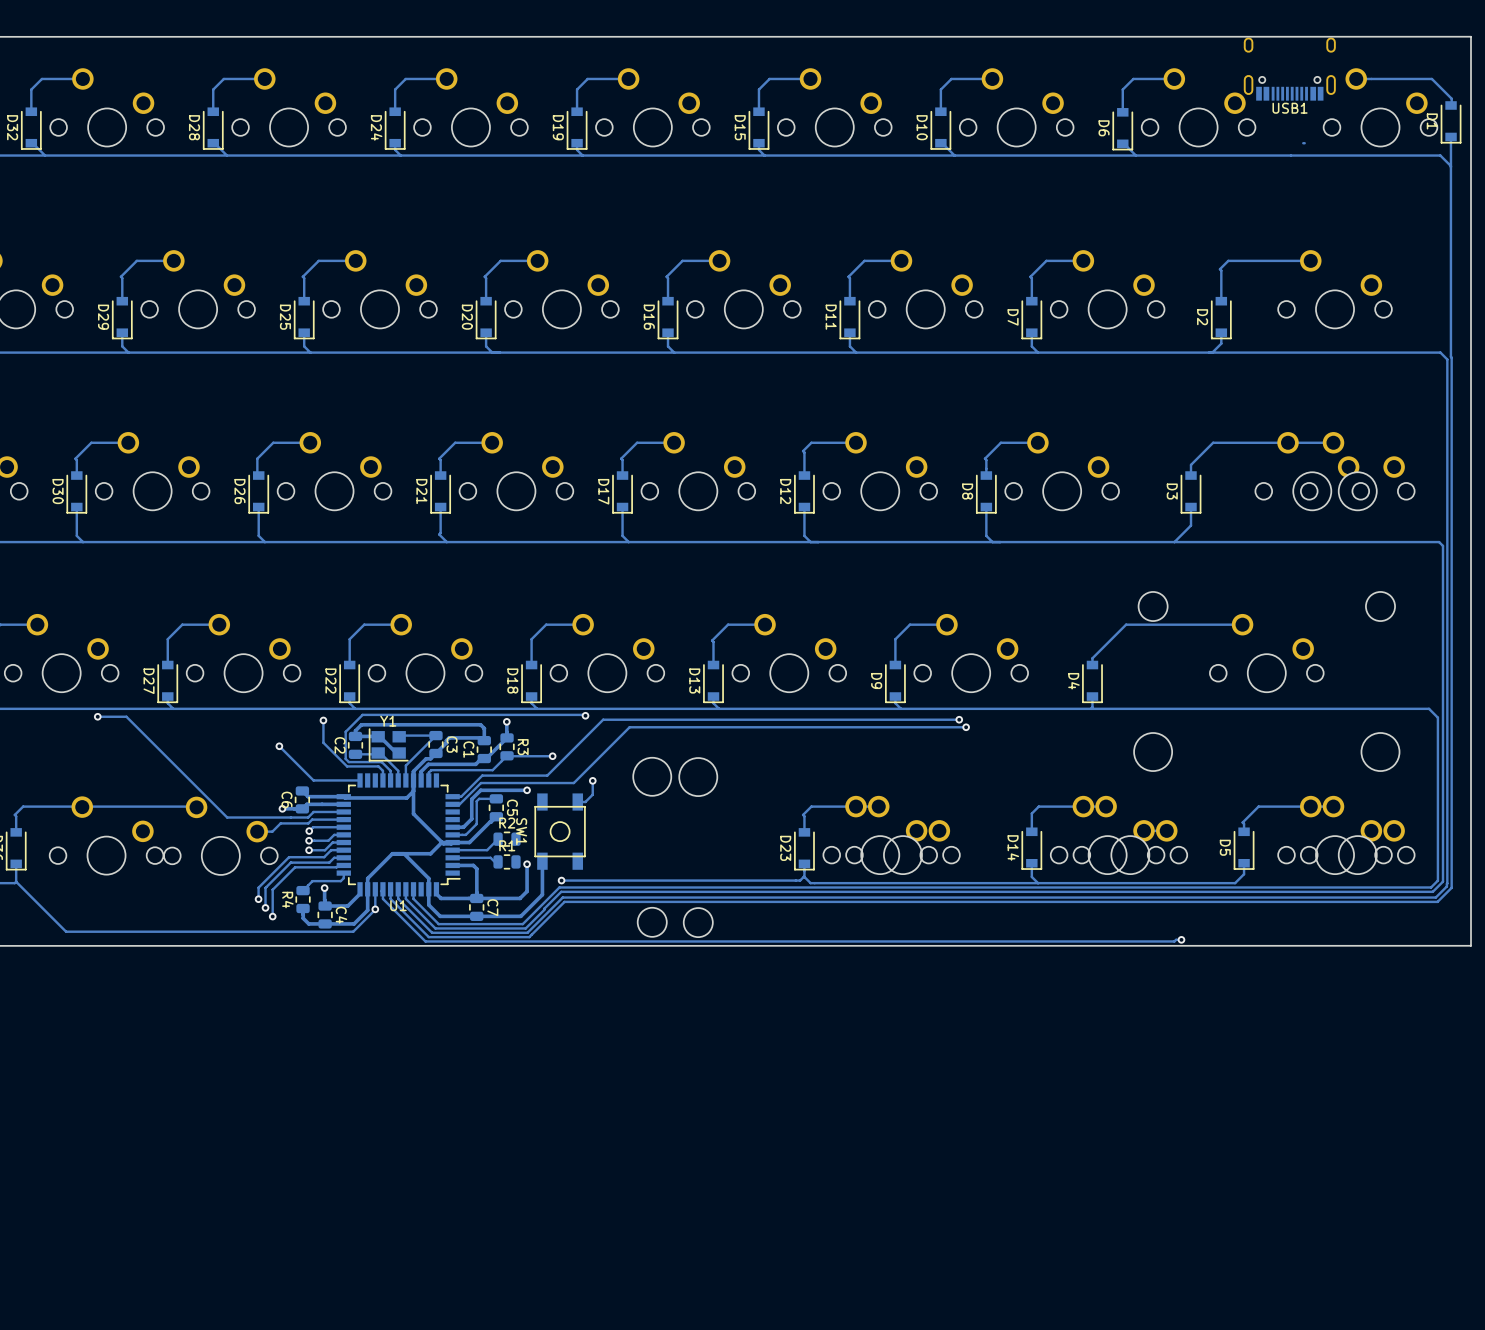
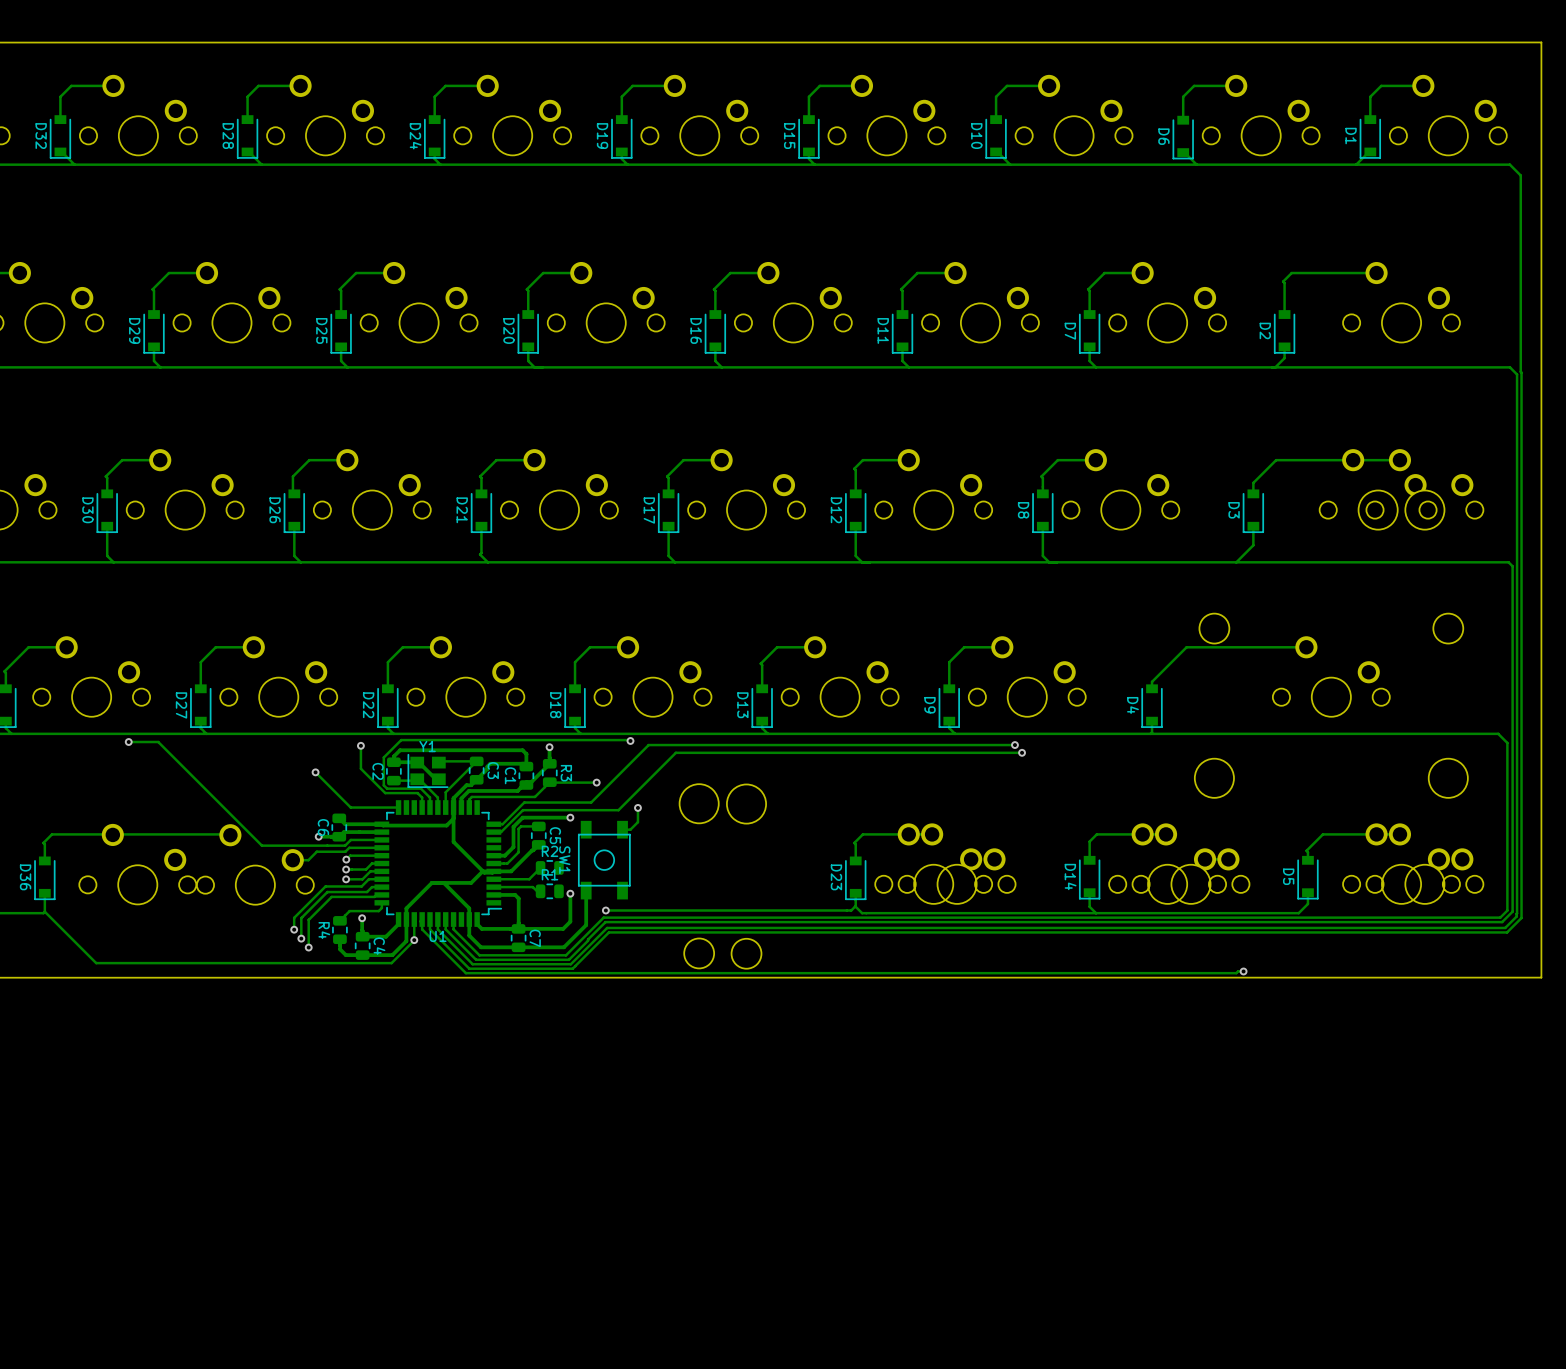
USB1: (1289, 69) -> none
track: (1356, 78) (1431, 78) (1451, 98) (1451, 105) -> (1423, 85) (1381, 85) (1370, 96) (1370, 119)
D1 position: (1451, 122) -> (1370, 136)
track: (1450, 136) (1450, 166) -> none
track: none -> (1368, 152) (1356, 164)

